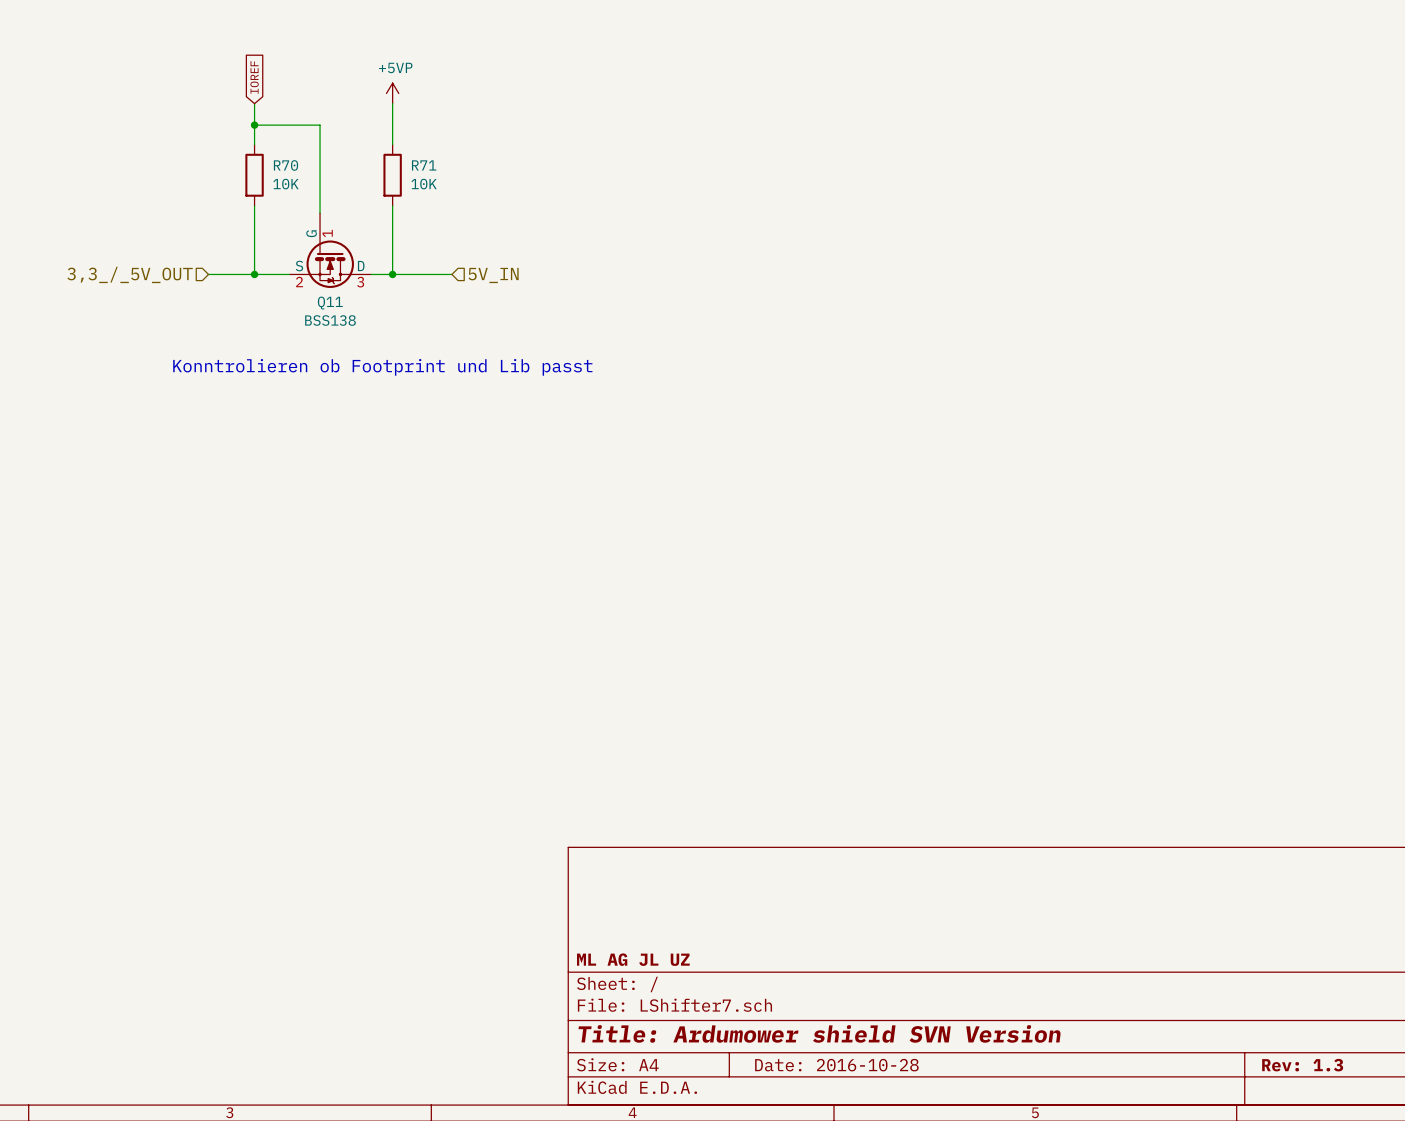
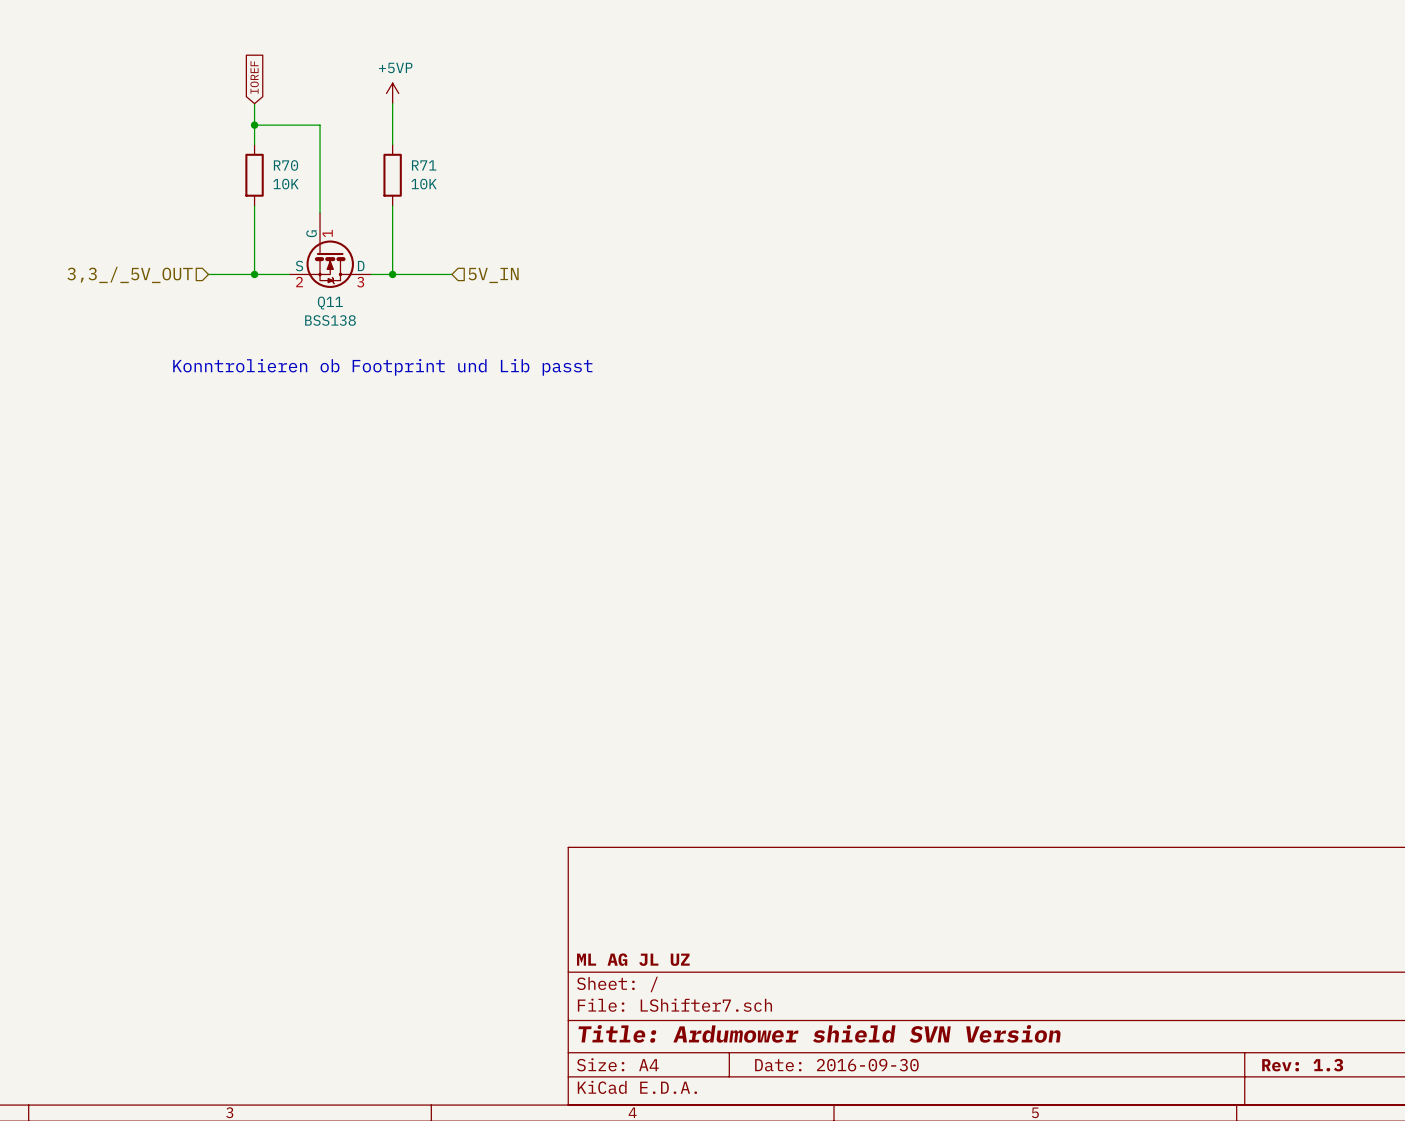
title block: Date: 2016-10-28 (836, 1065) -> Date: 2016-09-30 (836, 1065)

